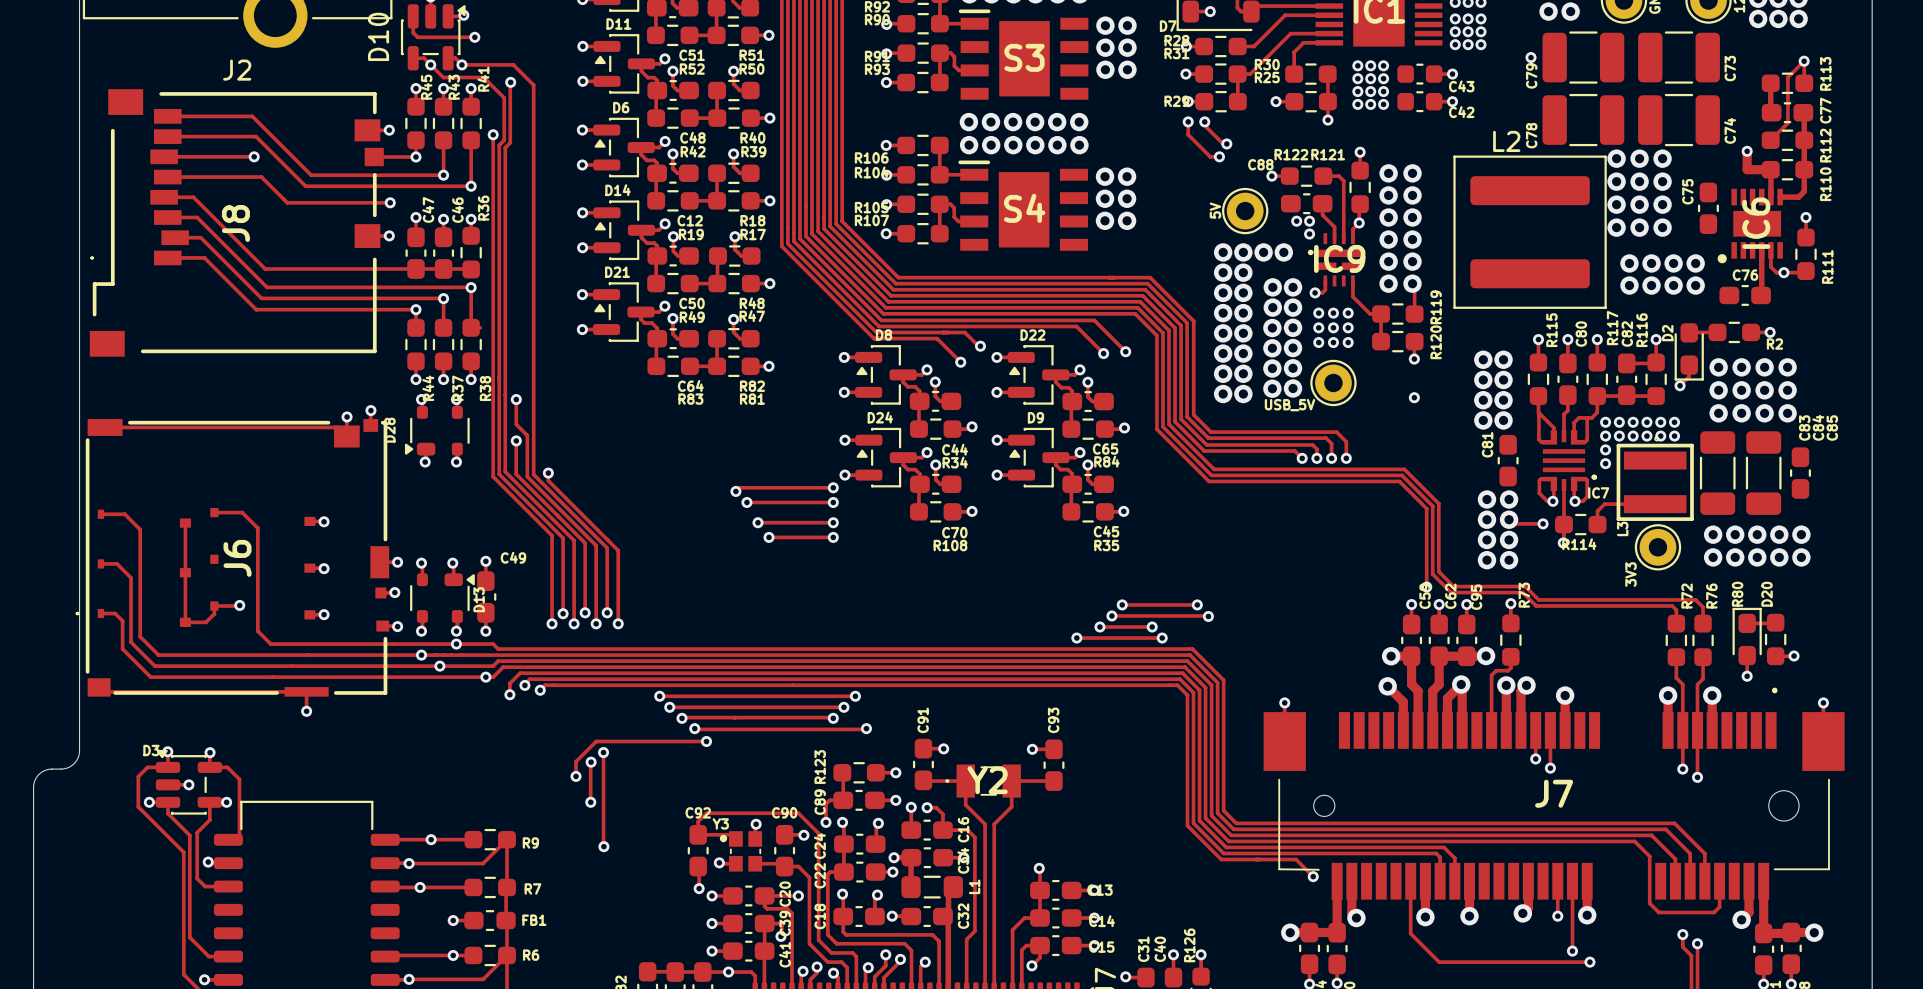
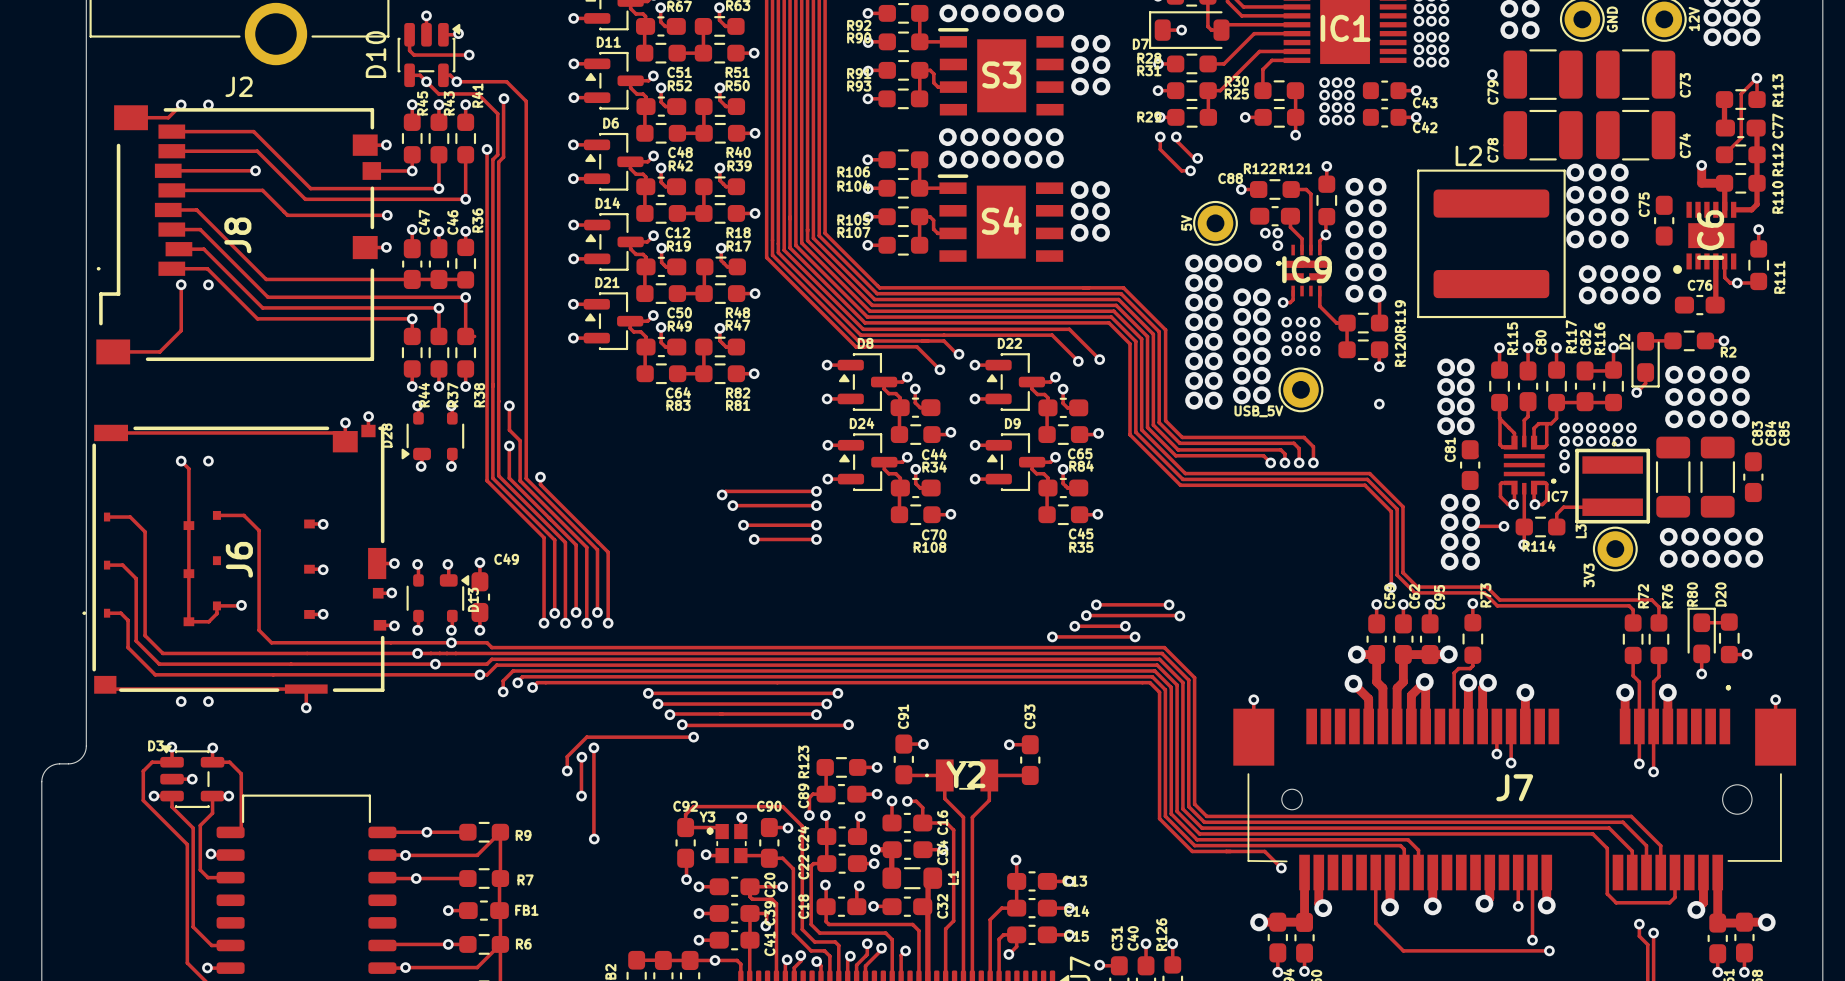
track: none -> (181, 104) (168, 117) (131, 117)
via: none -> (181, 104)
via: none -> (208, 104)
track: none -> (181, 284) (181, 330) (159, 351) (113, 351)
via: none -> (181, 284)
via: none -> (208, 284)
track: none -> (181, 461) (188, 468) (188, 525)
via: none -> (181, 461)
via: none -> (208, 461)
via: none -> (181, 701)
via: none -> (208, 701)

